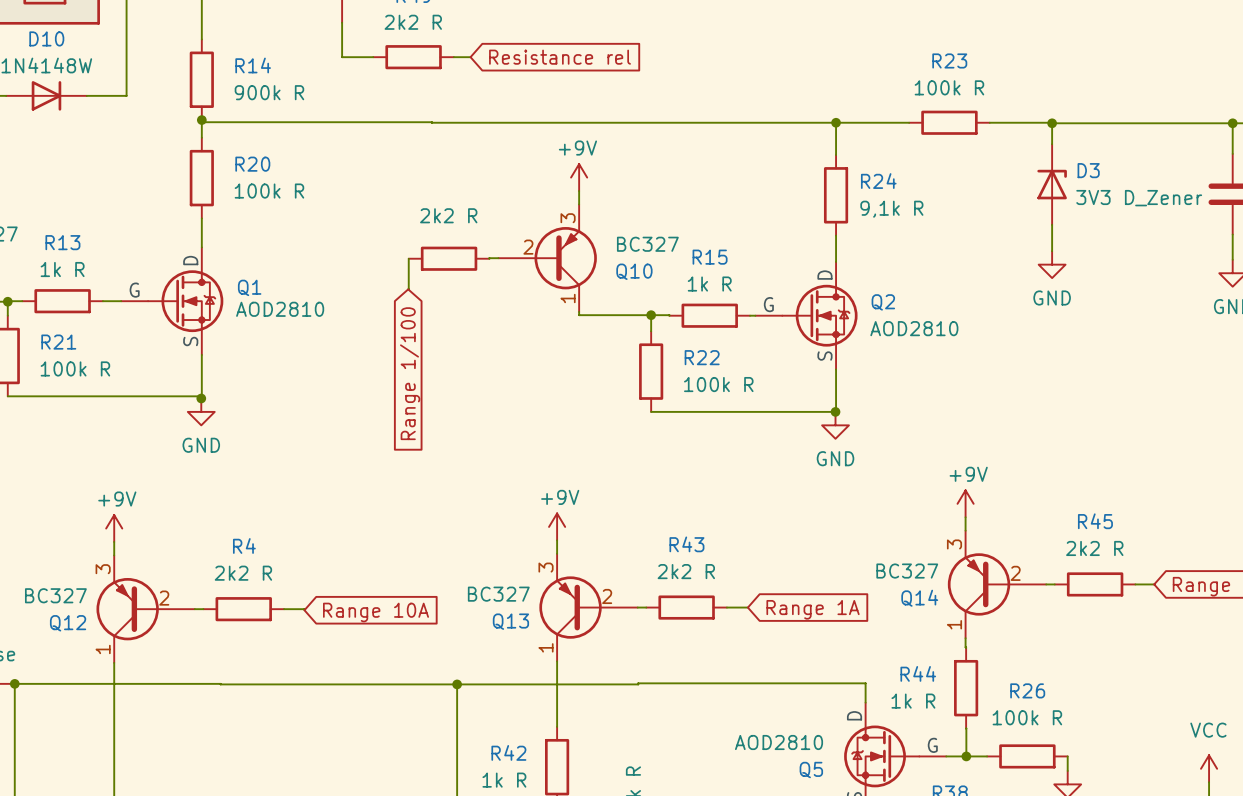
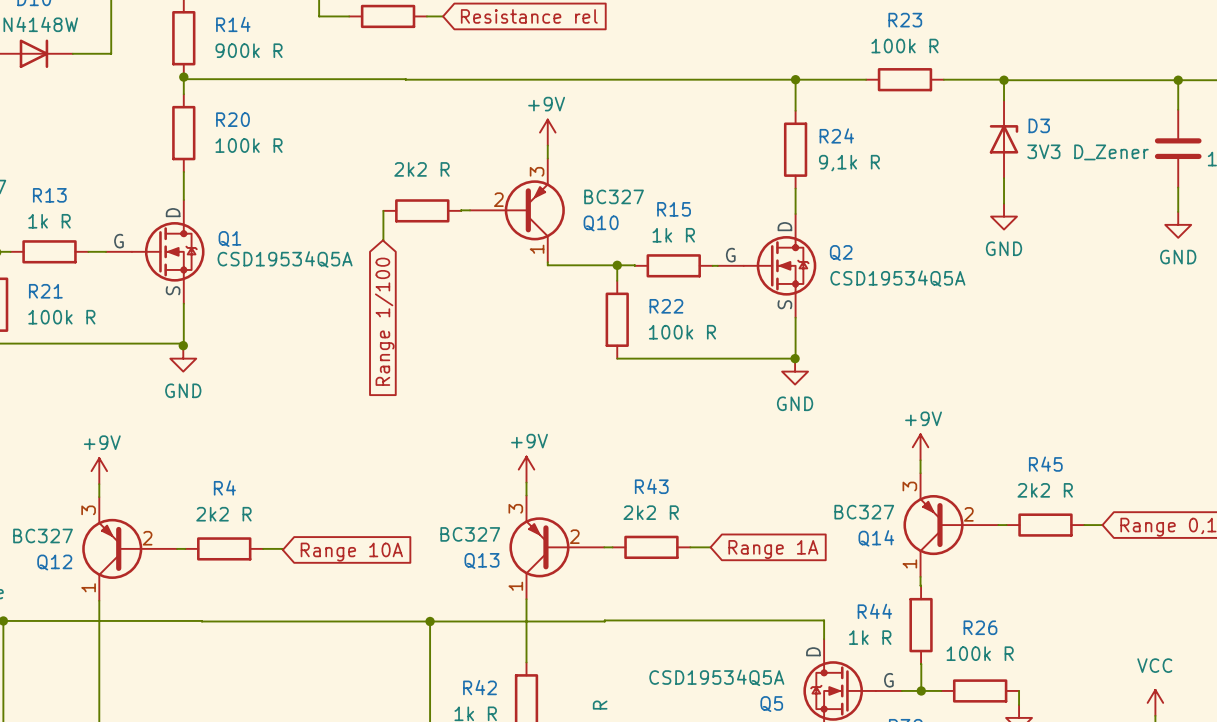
Q1 value: AOD2810 (280, 309) -> CSD19534Q5A (285, 259)
Q2 value: AOD2810 (914, 328) -> CSD19534Q5A (897, 278)
Q5 value: AOD2810 (779, 742) -> CSD19534Q5A (716, 677)

